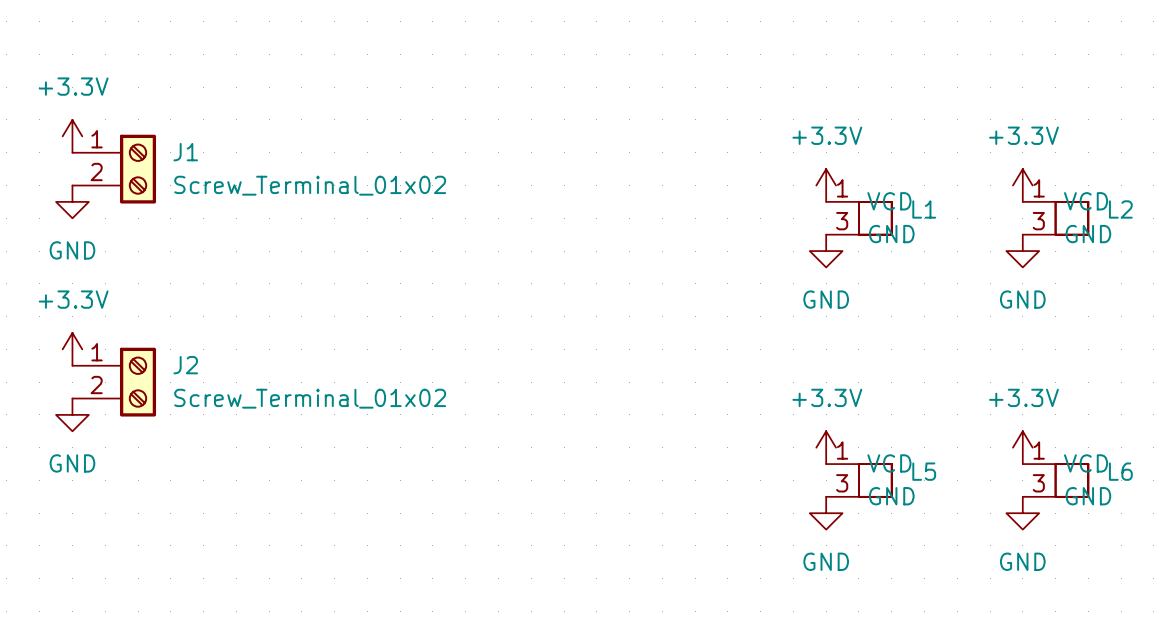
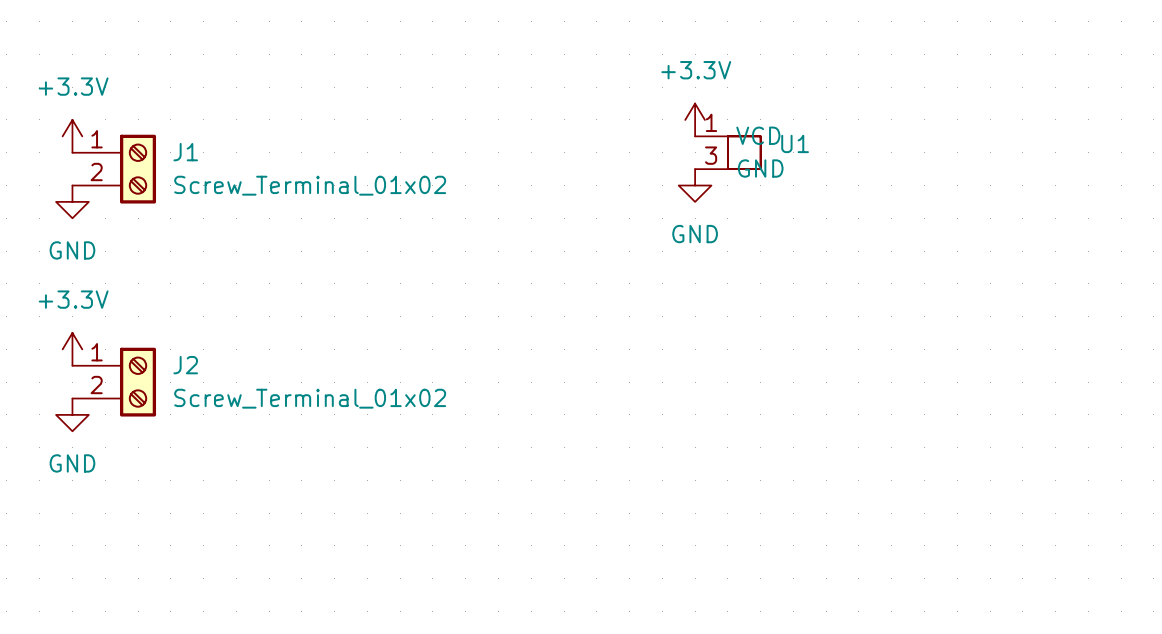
U1: none -> (727, 152)
power symbol position: +3.3V (826, 185) -> +3.3V (695, 119)
power symbol: +3.3V (1022, 185) -> none
L1: (858, 218) -> none
L2: (1055, 218) -> none
power symbol position: GND (826, 251) -> GND (695, 185)
power symbol: GND (1022, 251) -> none
power symbol: +3.3V (826, 447) -> none
power symbol: +3.3V (1022, 447) -> none
L5: (858, 480) -> none
L6: (1055, 480) -> none
power symbol: GND (826, 513) -> none
power symbol: GND (1022, 513) -> none

